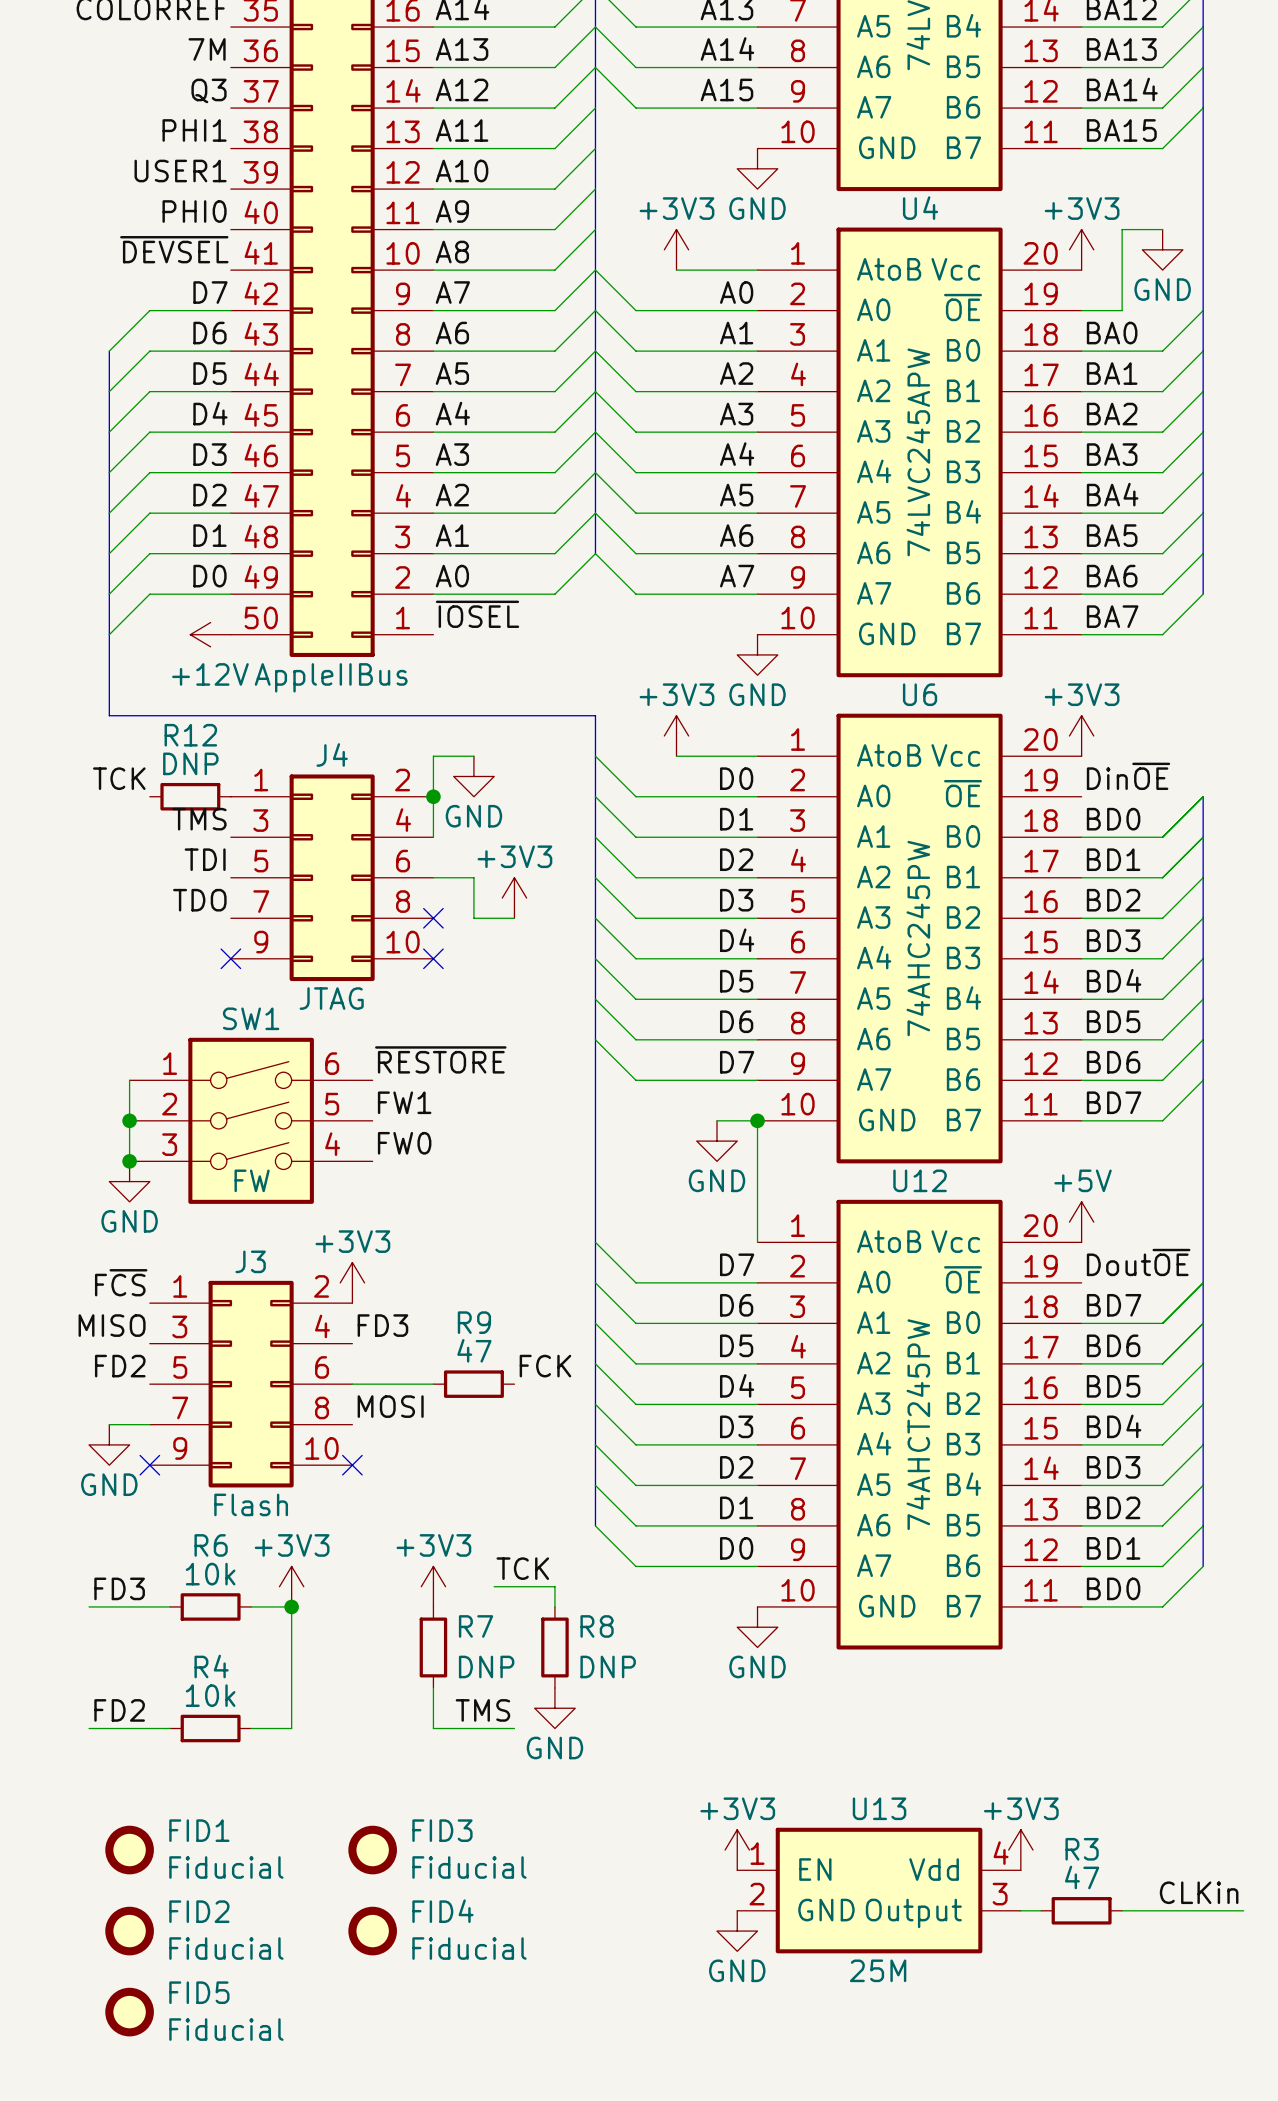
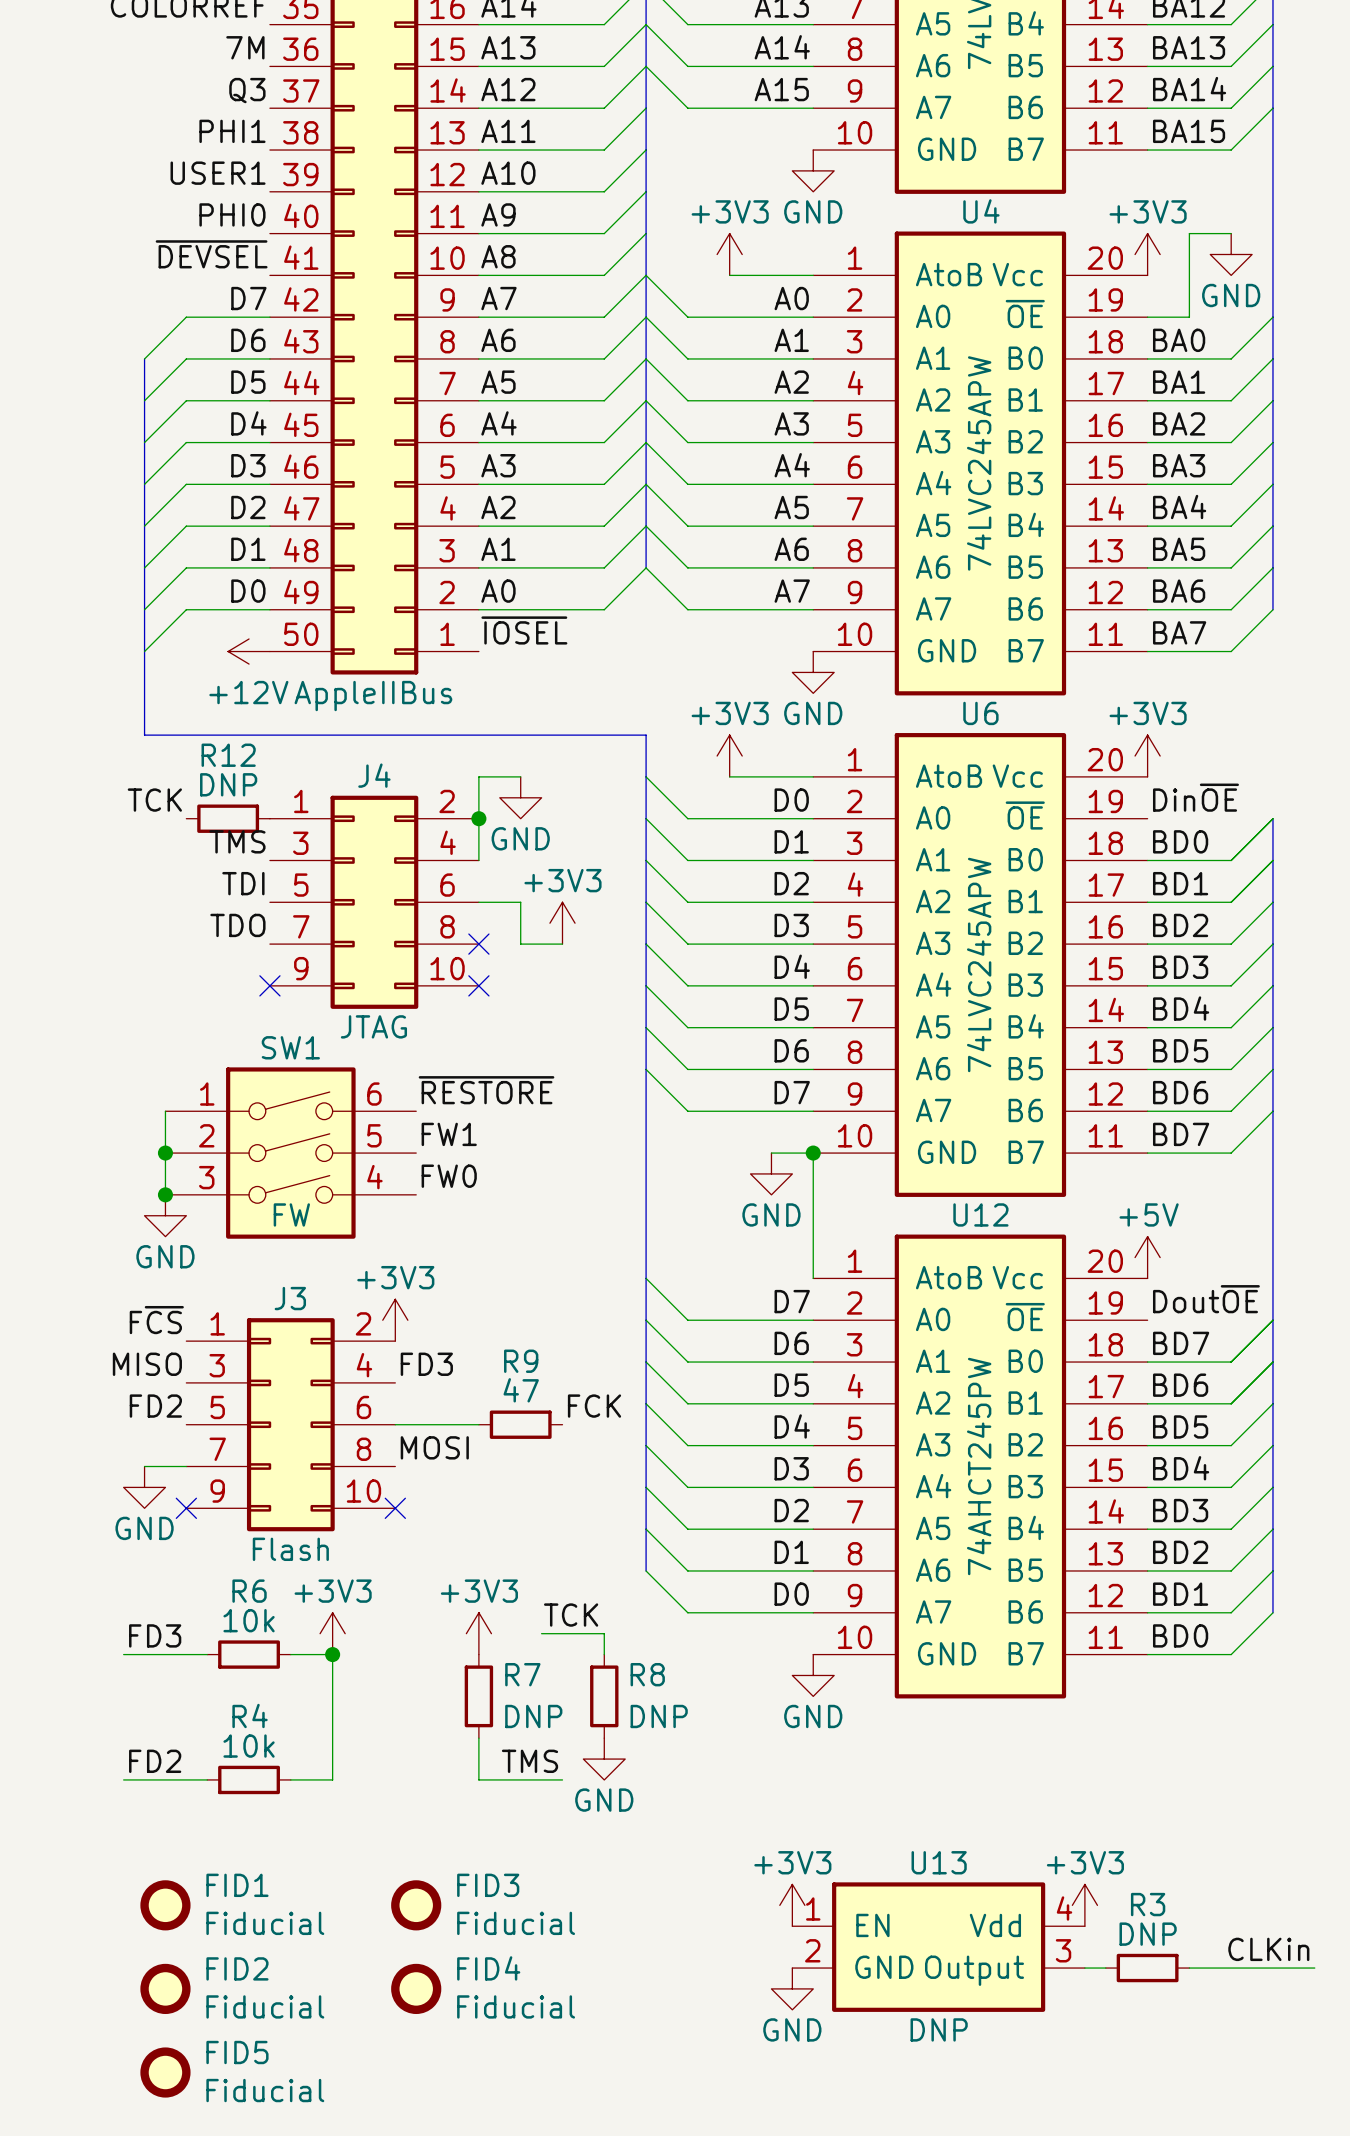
U6 value: 74AHC245PW (918, 938) -> 74LVC245APW (979, 964)
R3 value: 47 (1082, 1877) -> DNP (1148, 1934)
U13 value: 25M (878, 1970) -> DNP (939, 2029)

